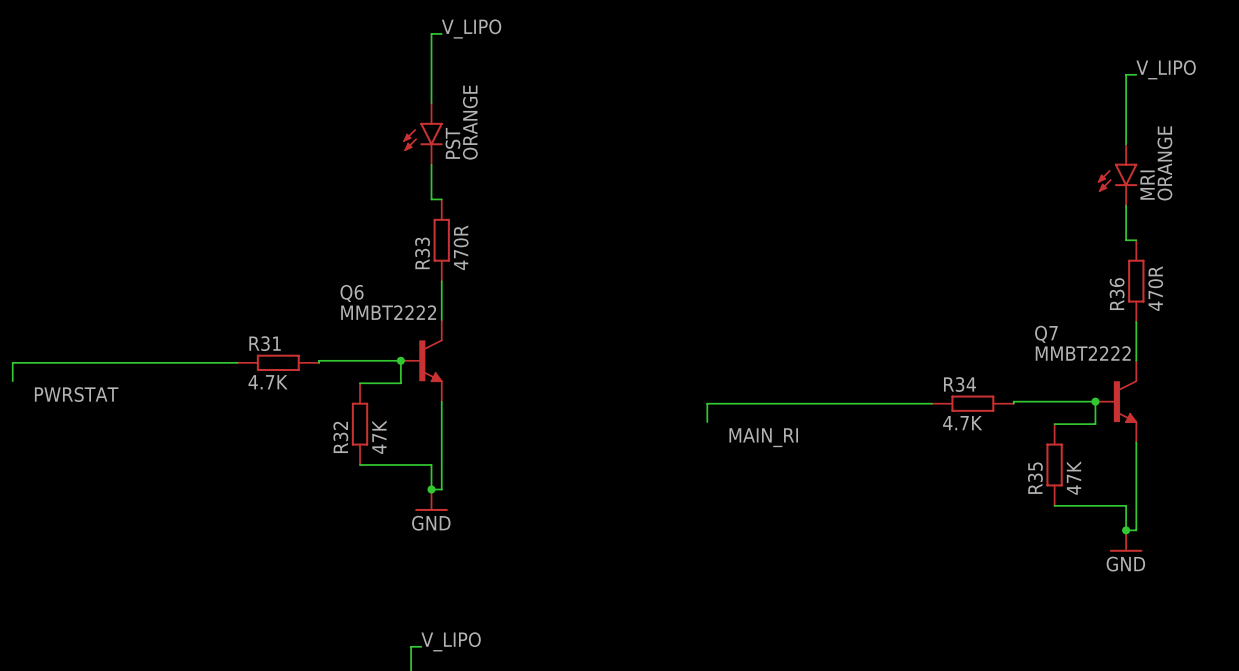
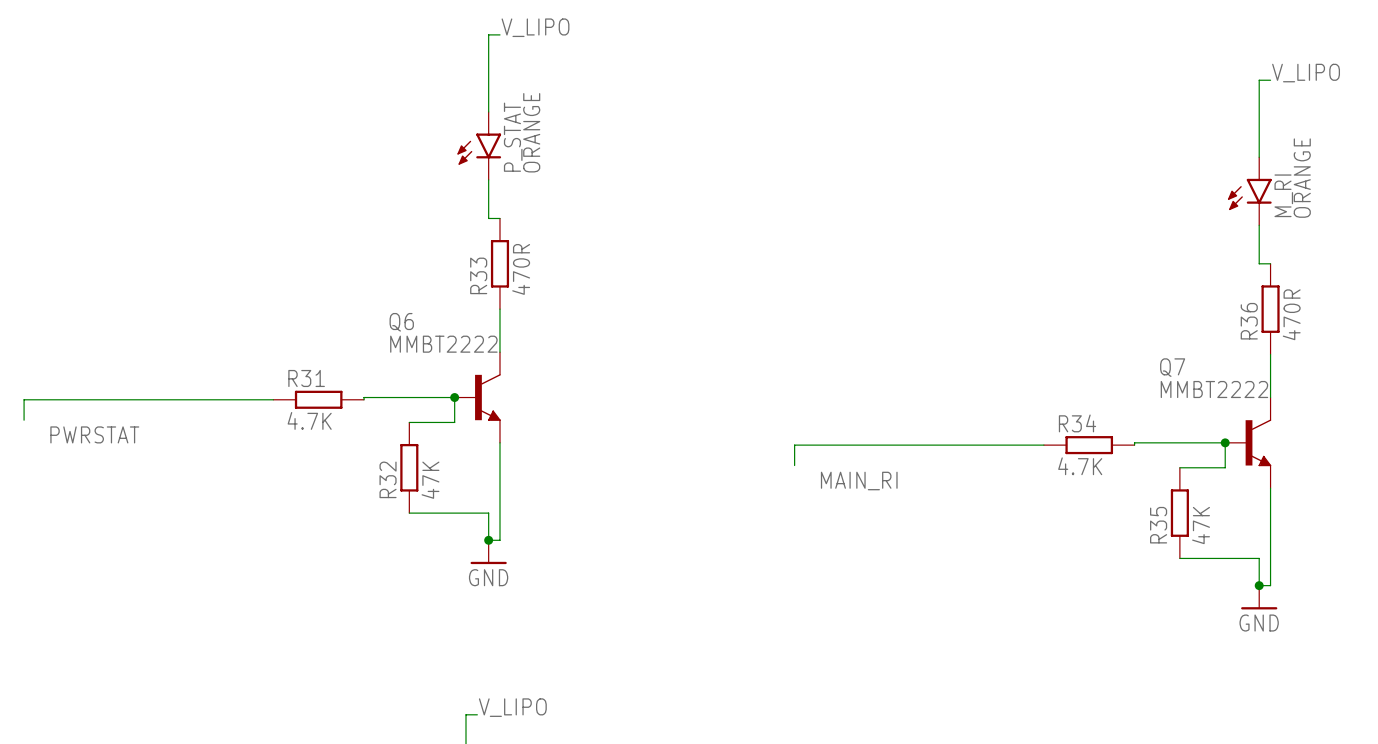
PST name: PST (452, 143) -> P_STAT (513, 137)
MRI name: MRI (1147, 185) -> M_RI (1283, 195)

